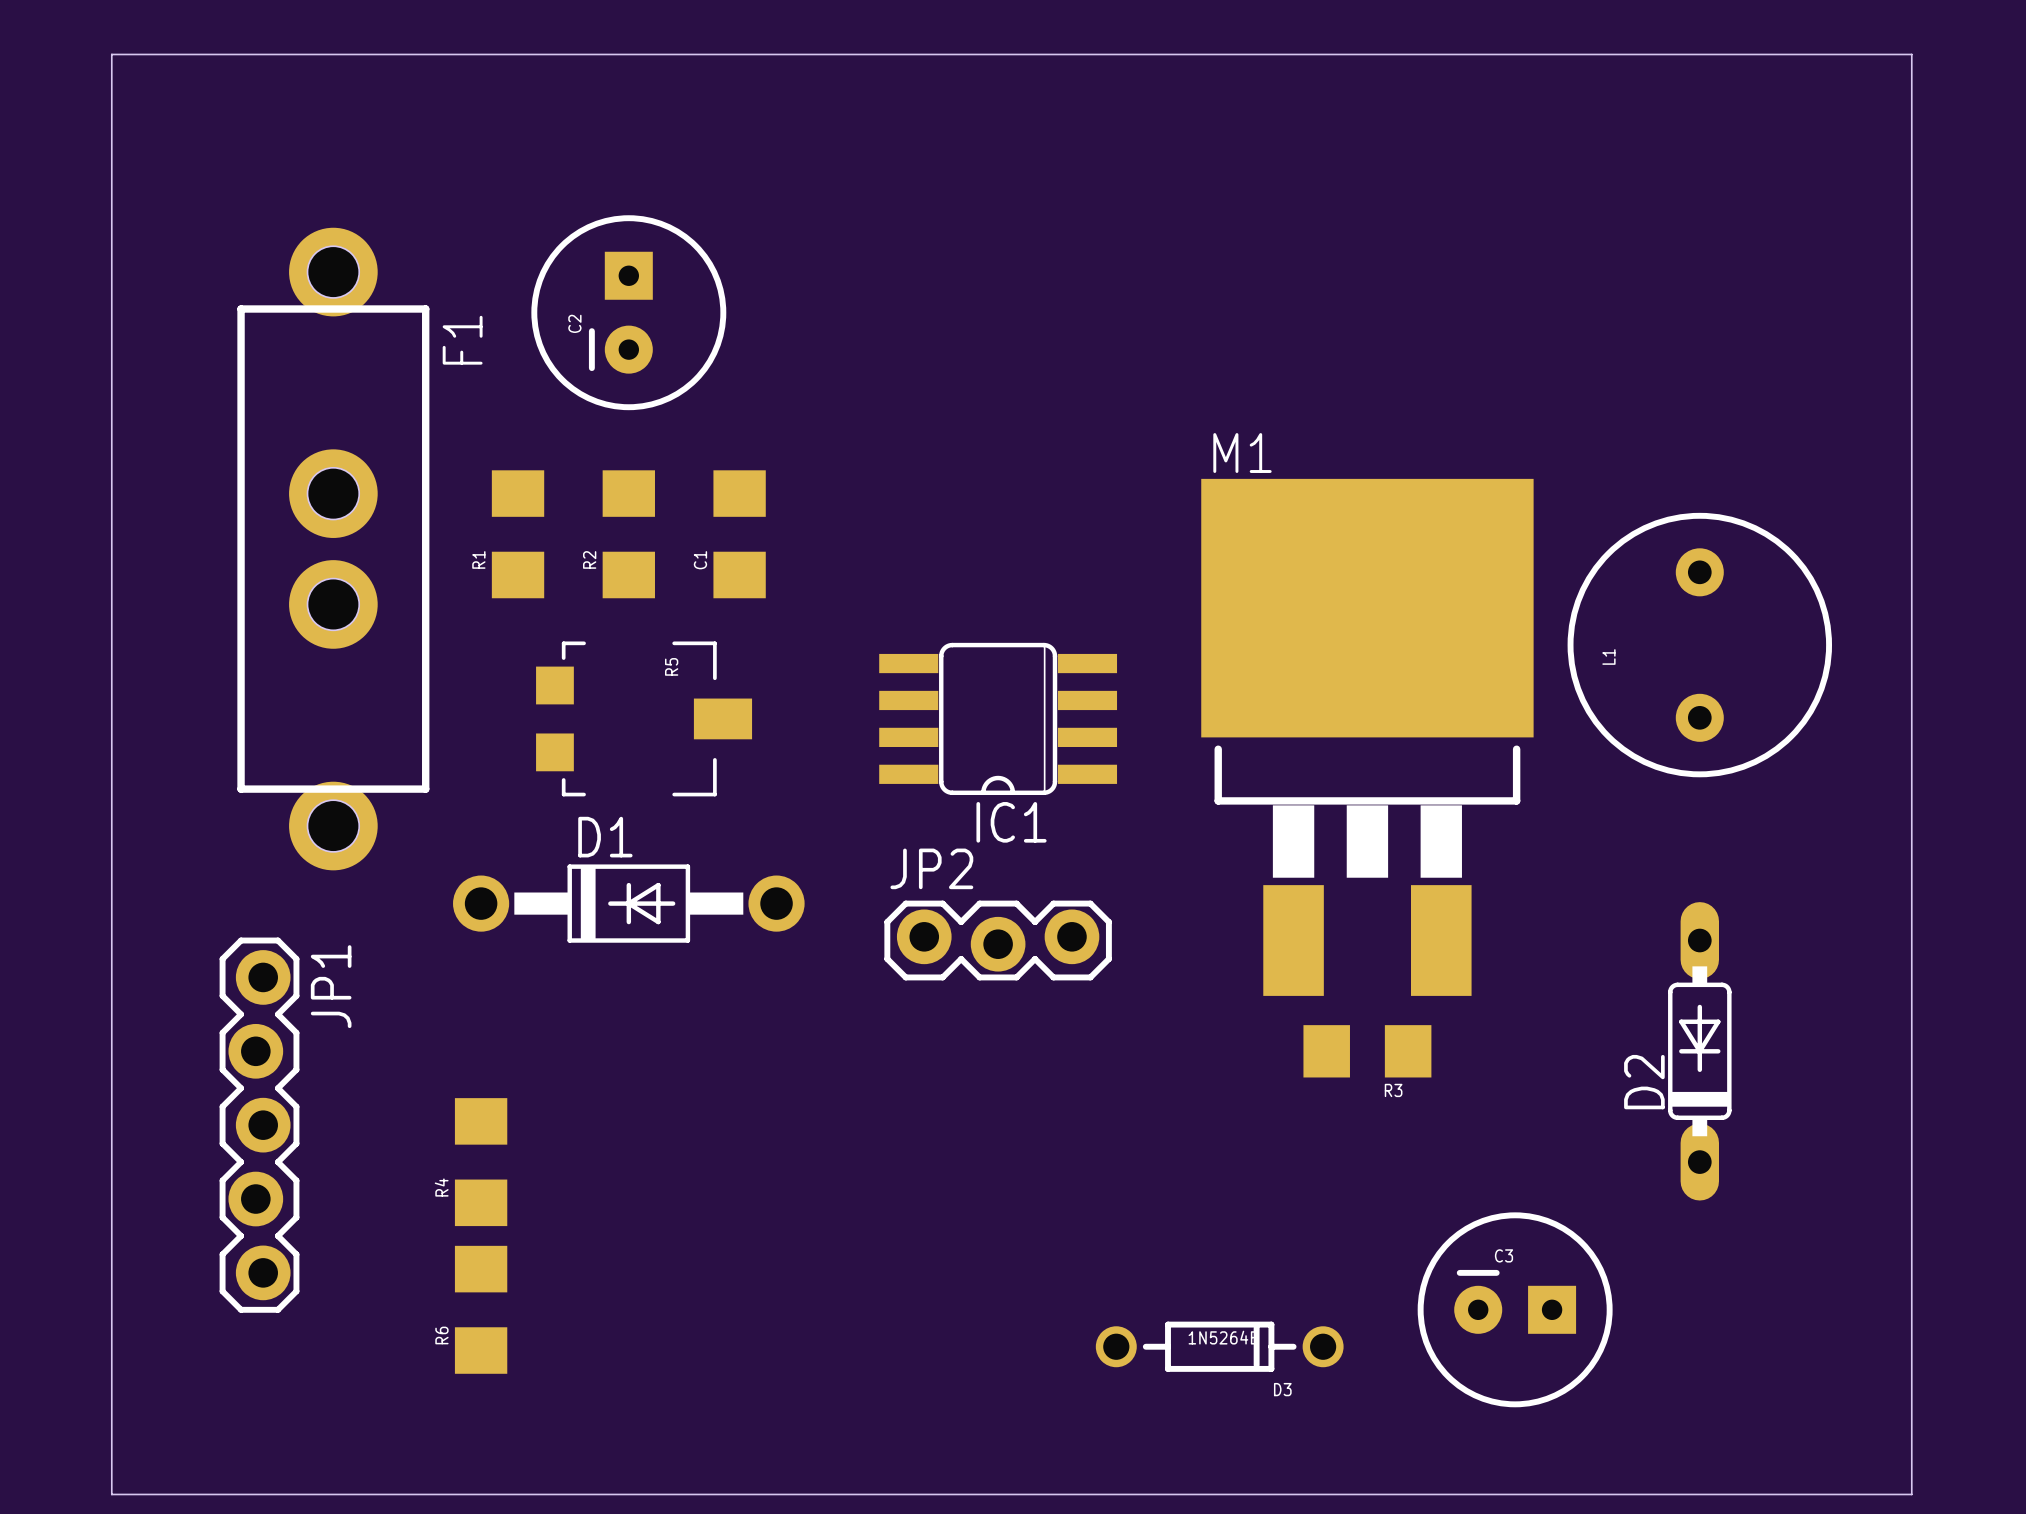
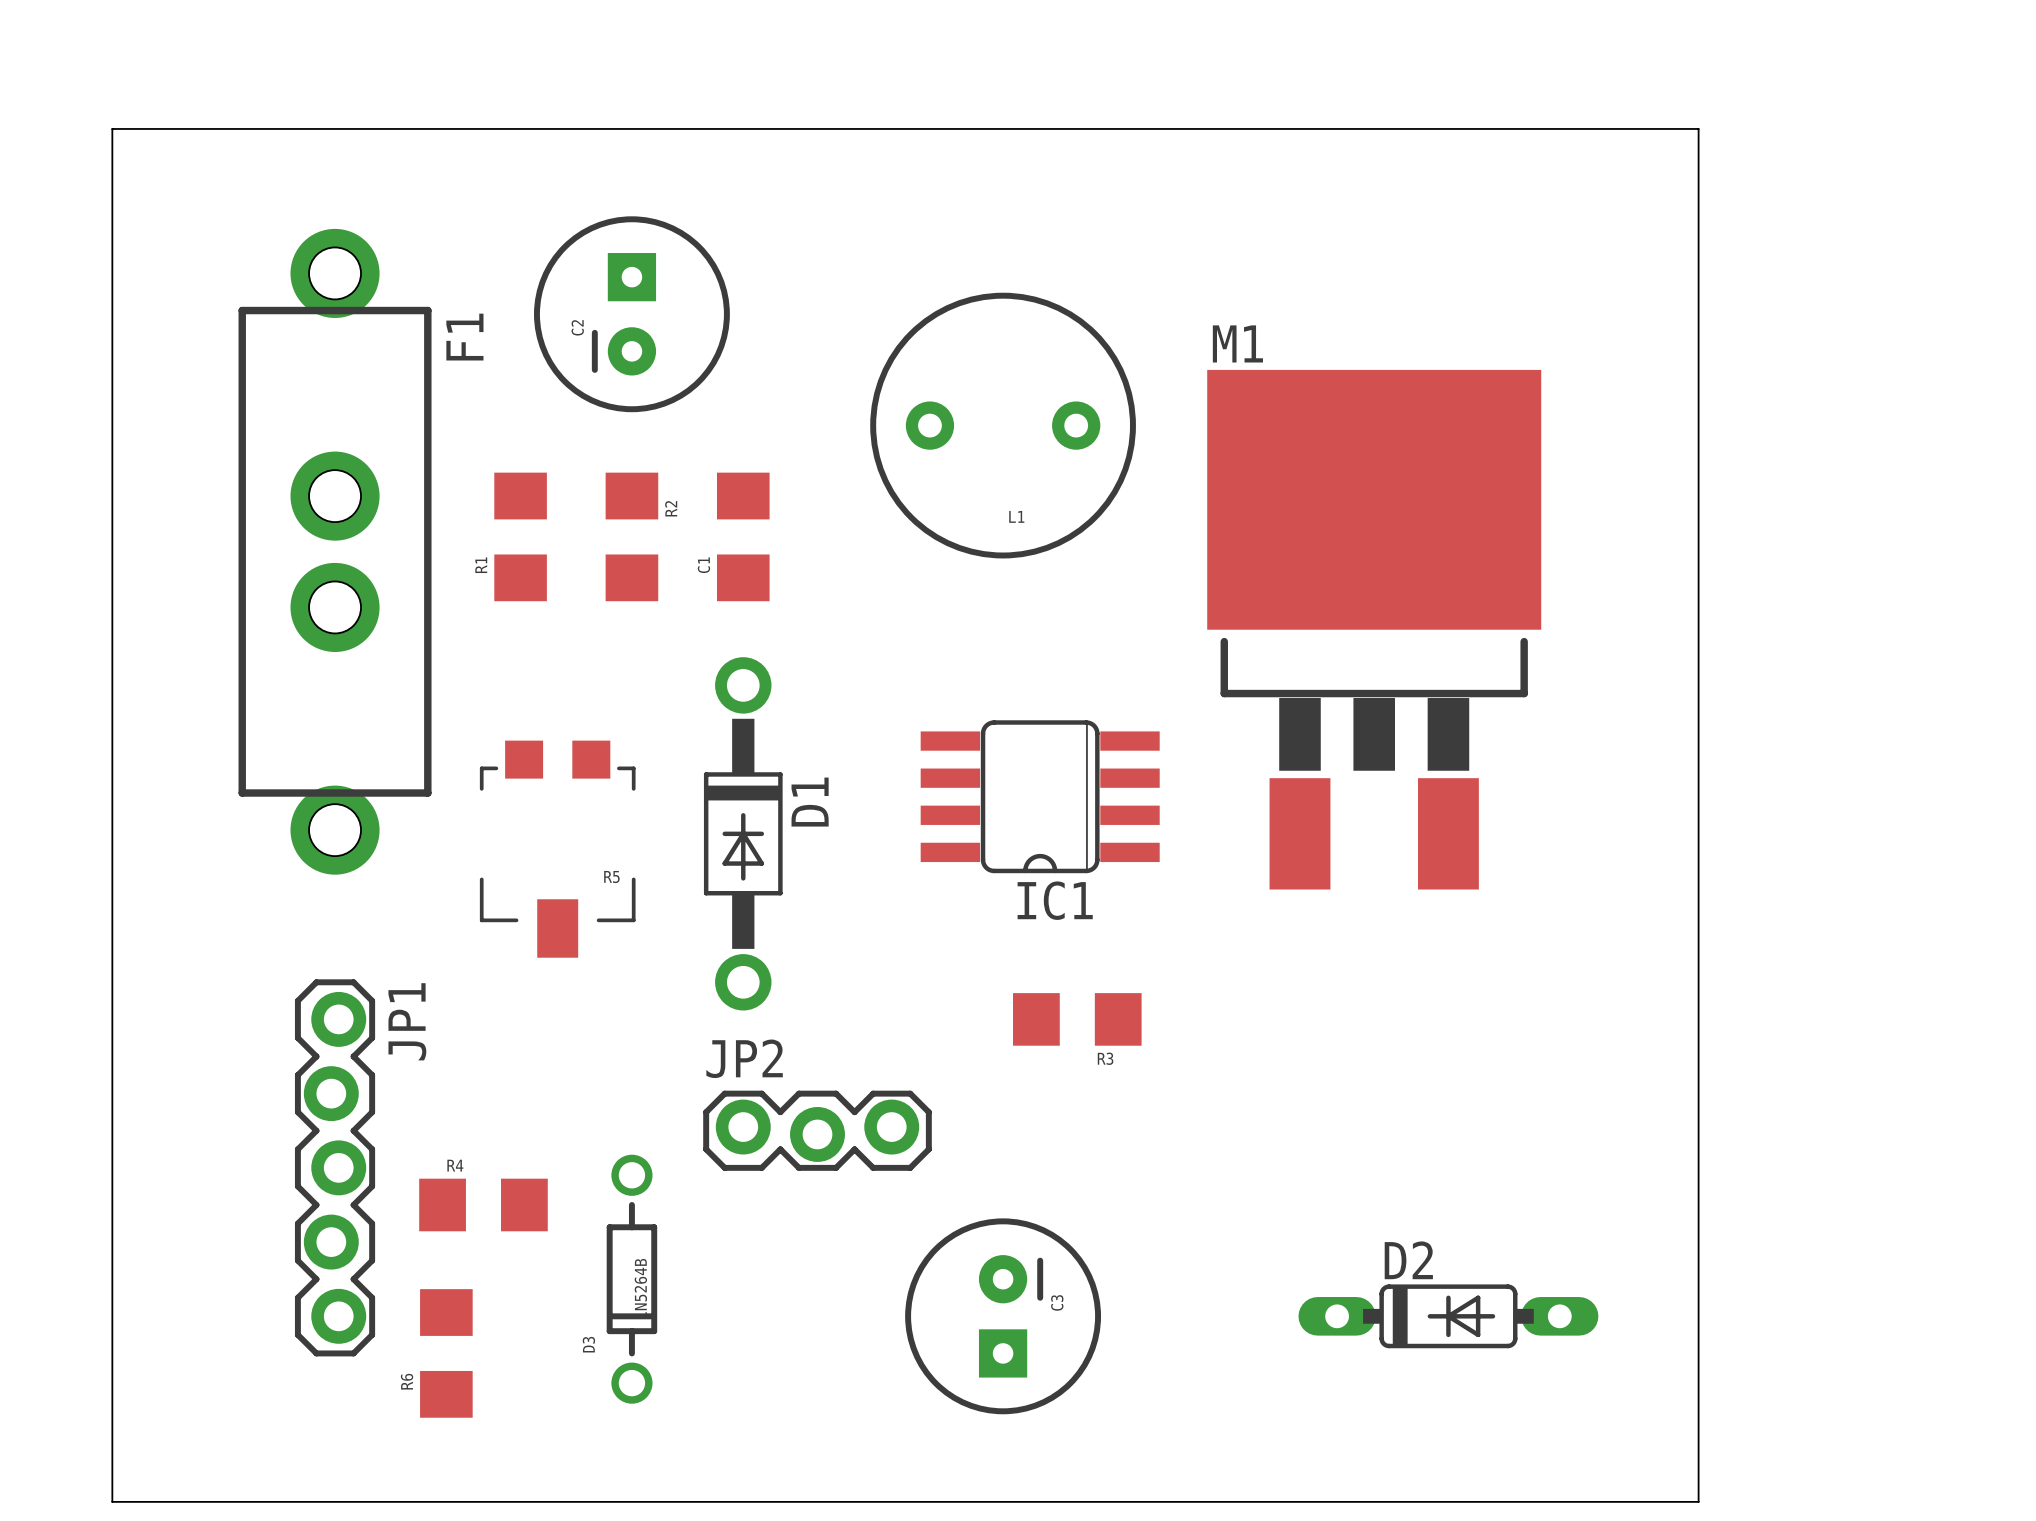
board edge: (111, 128) (111, 54) (1911, 54) (1911, 1494) (1690, 1494) -> (112, 128) (1698, 128) (1698, 1501)
R2 name position: R2 (589, 559) -> R2 (671, 508)
L1 rotation: 0° (1699, 645) -> 90° clockwise (1003, 425)
L1 position: (1699, 645) -> (1003, 425)
L1 name position: L1 (1608, 656) -> L1 (1016, 516)
R5 rotation: 0° (644, 718) -> 90° clockwise (557, 849)
R5 position: (644, 718) -> (557, 849)
IC1 position: (998, 718) -> (1040, 796)
M1 position: (1367, 737) -> (1374, 629)
D1 rotation: 0° (628, 903) -> 90° clockwise (743, 833)
JP2 position: (998, 940) -> (817, 1130)
R3 position: (1367, 1051) -> (1077, 1019)
D2 rotation: 0° (1699, 1051) -> 90° clockwise (1448, 1316)
D2 position: (1699, 1051) -> (1448, 1316)
JP1 position: (259, 1125) -> (335, 1167)
R4 rotation: 0° (481, 1162) -> 90° clockwise (483, 1204)
R6 position: (481, 1309) -> (446, 1353)
C3 rotation: 0° (1515, 1309) -> 90° clockwise (1003, 1316)
C3 position: (1515, 1309) -> (1003, 1316)
D3 rotation: 0° (1219, 1346) -> 90° clockwise (631, 1279)
D3 position: (1219, 1346) -> (631, 1279)

